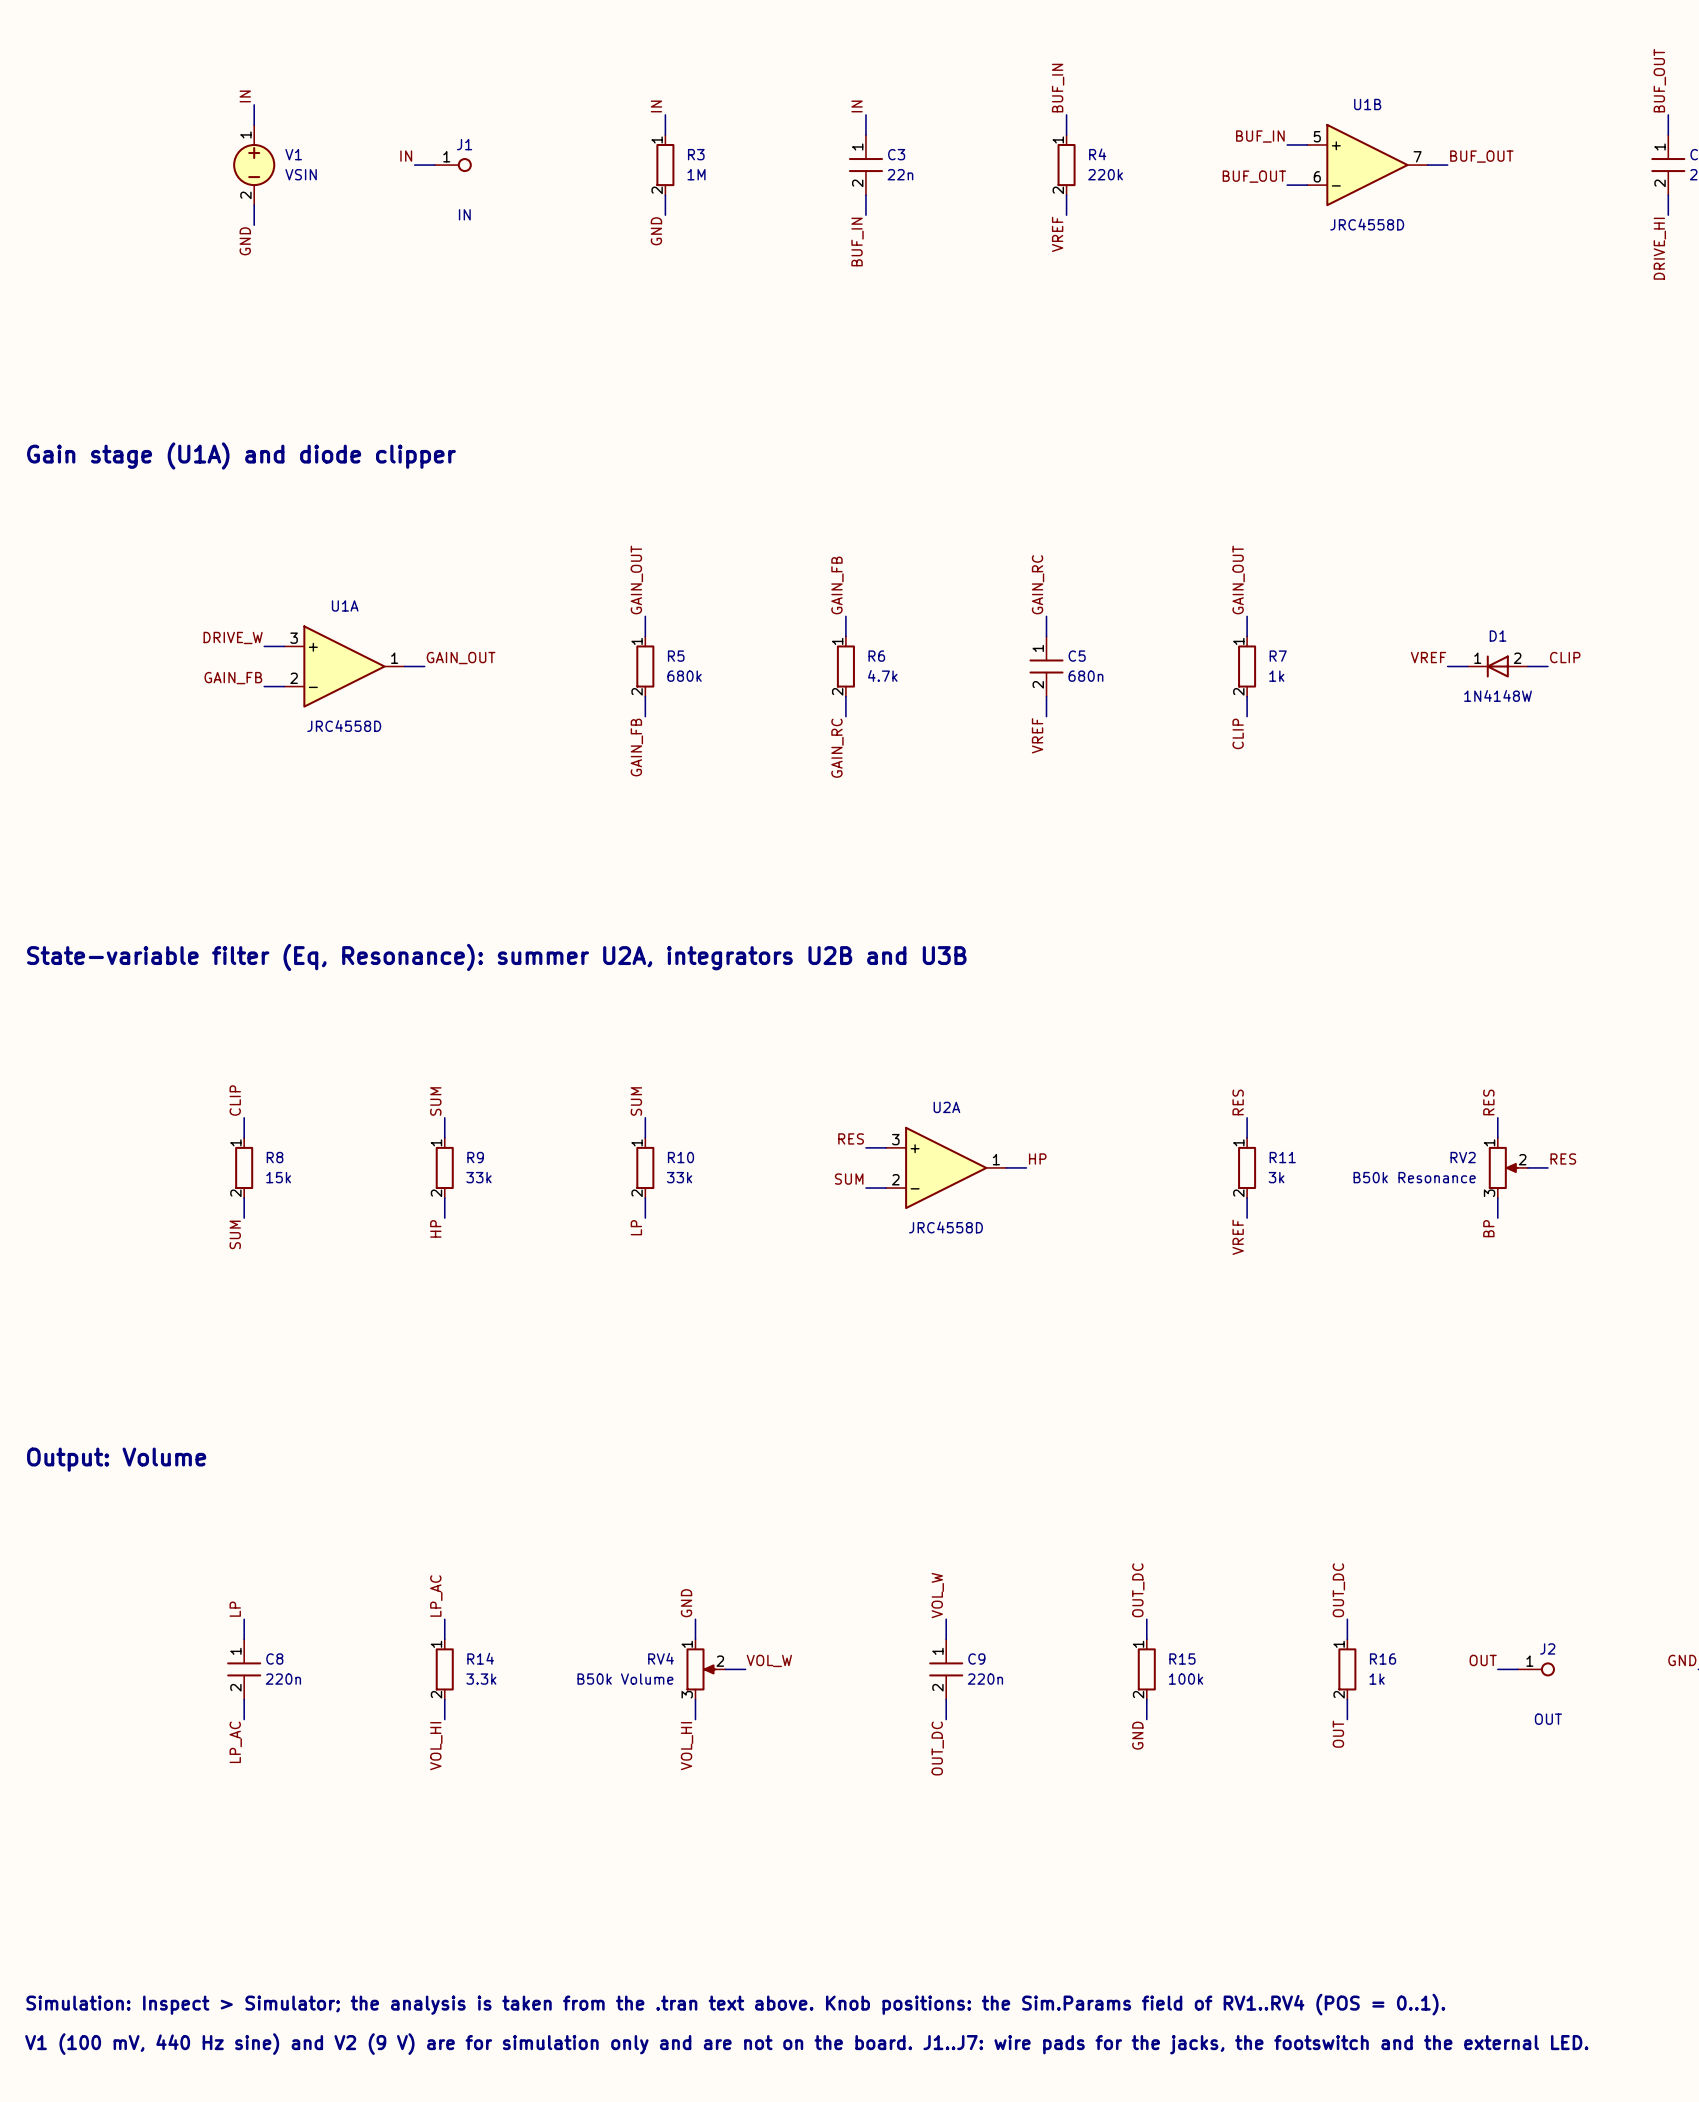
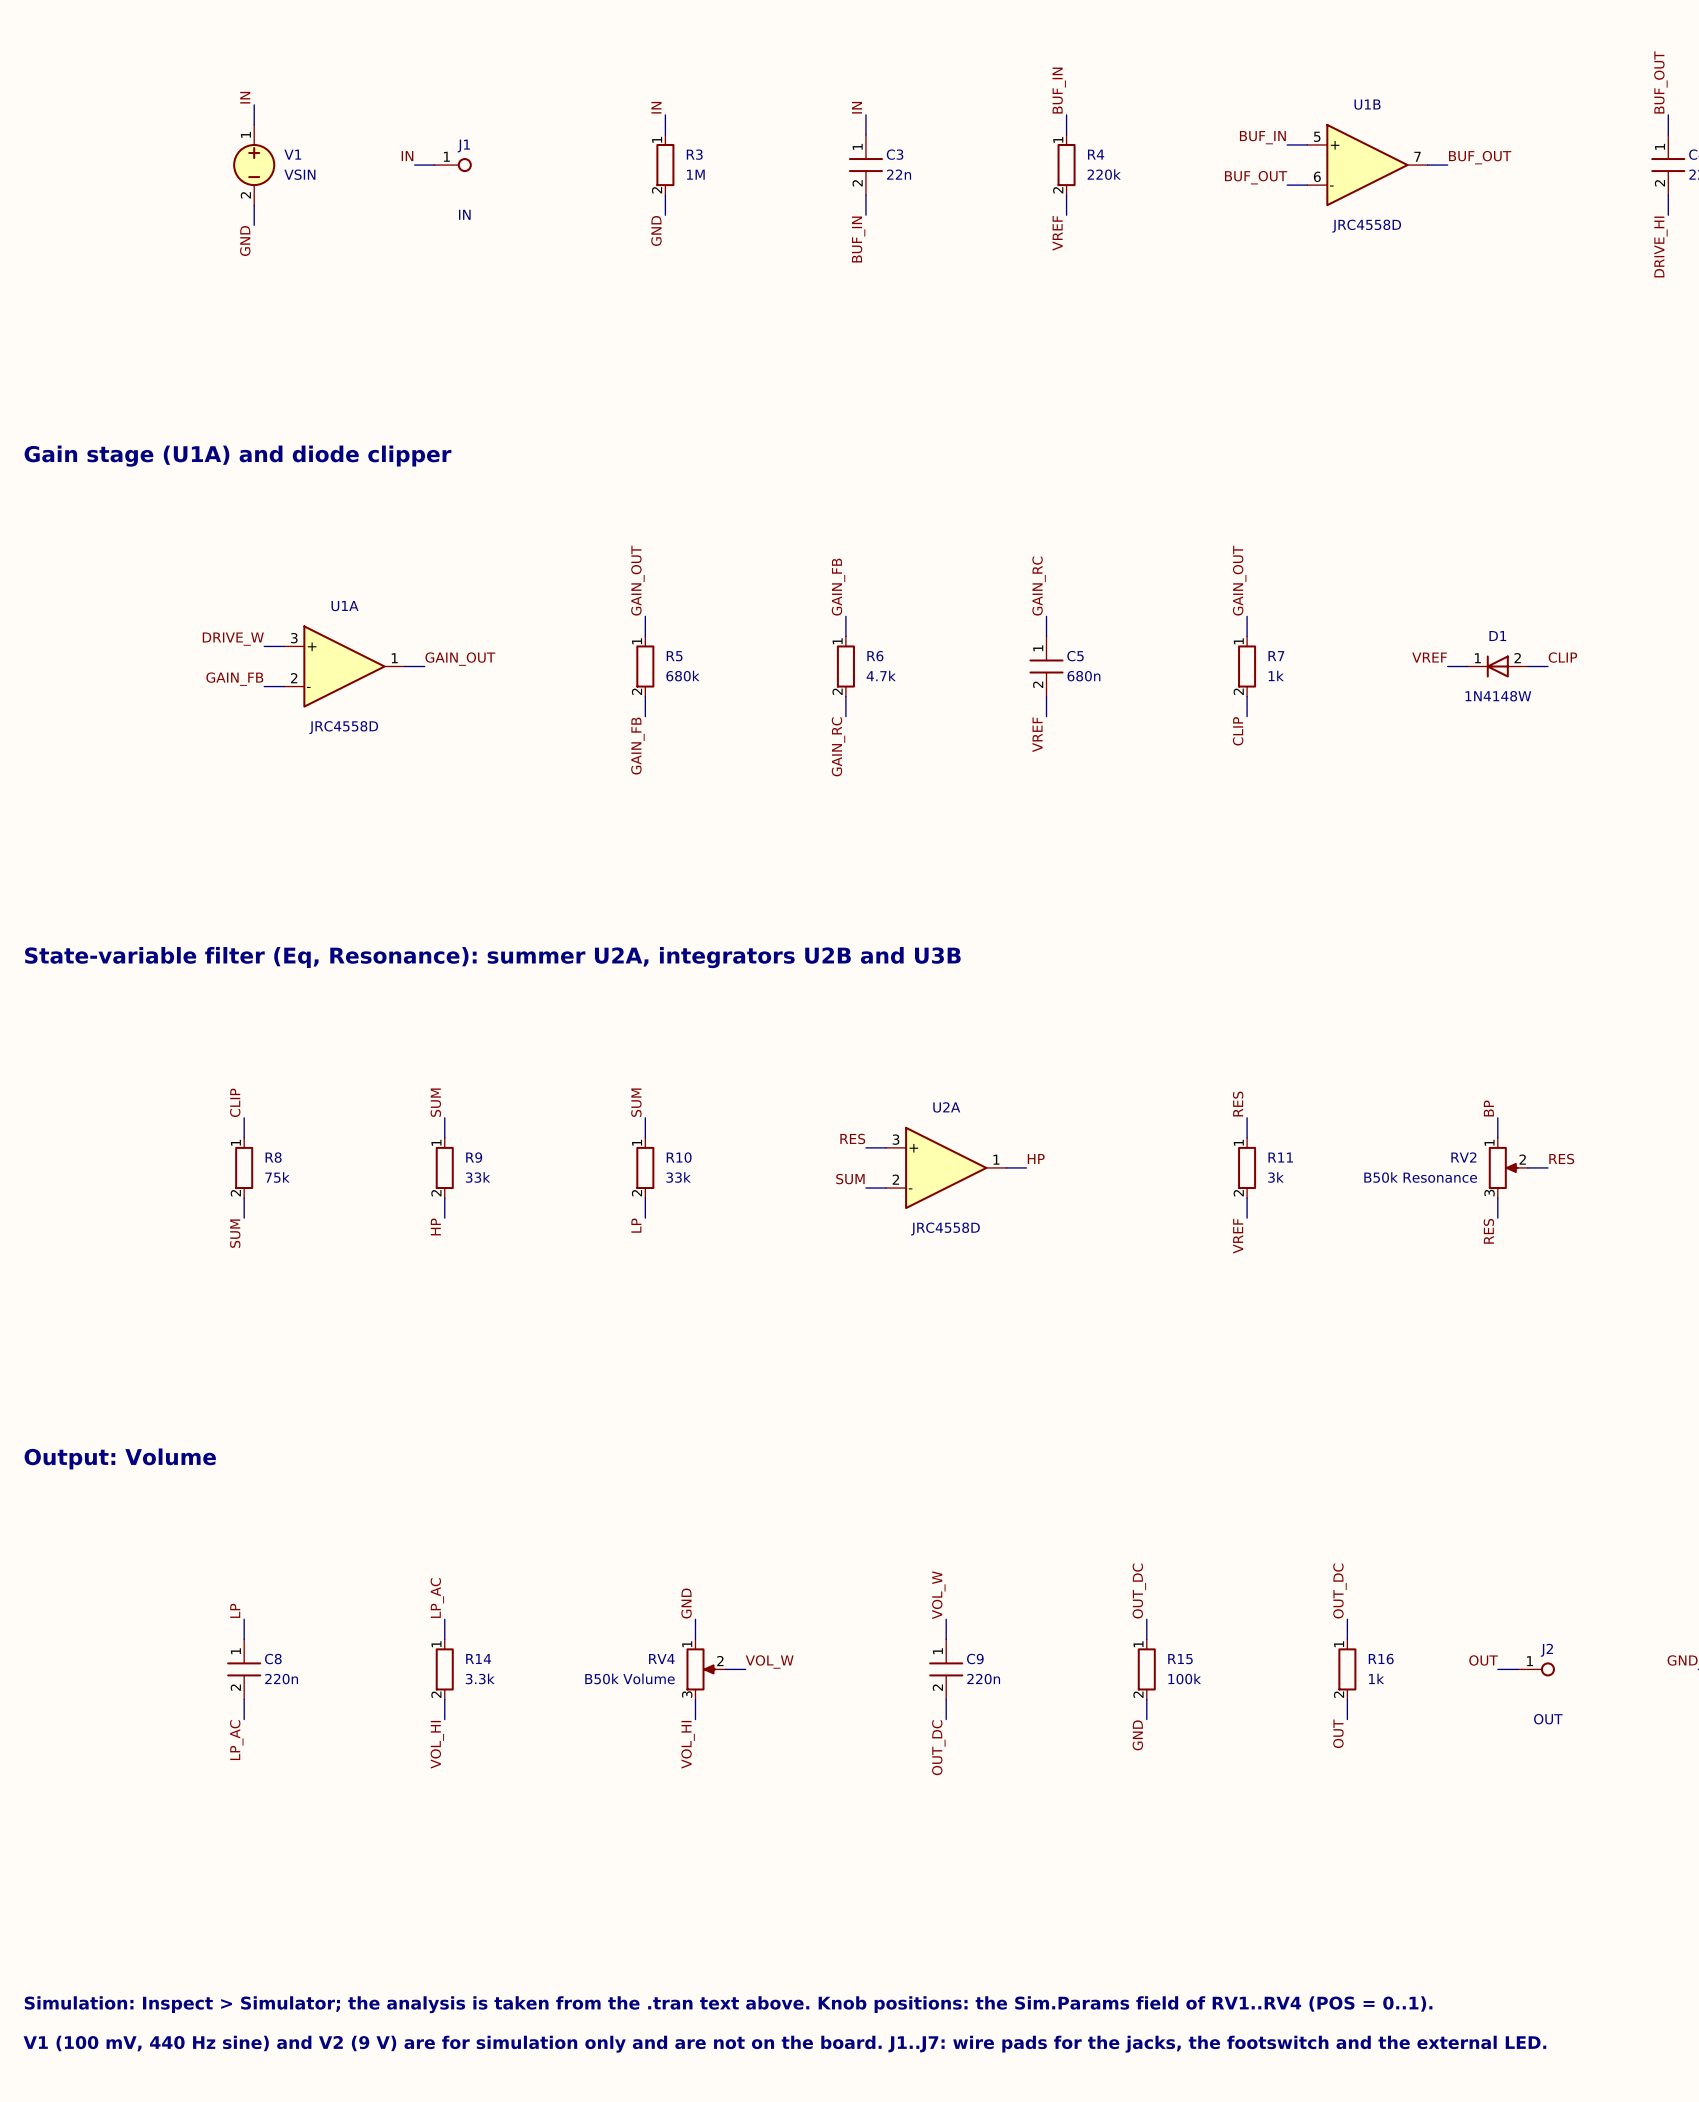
label: RES (1488, 1102) -> BP (1488, 1108)
R8 value: 15k (278, 1177) -> 75k (277, 1177)
label: BP (1488, 1228) -> RES (1488, 1231)

